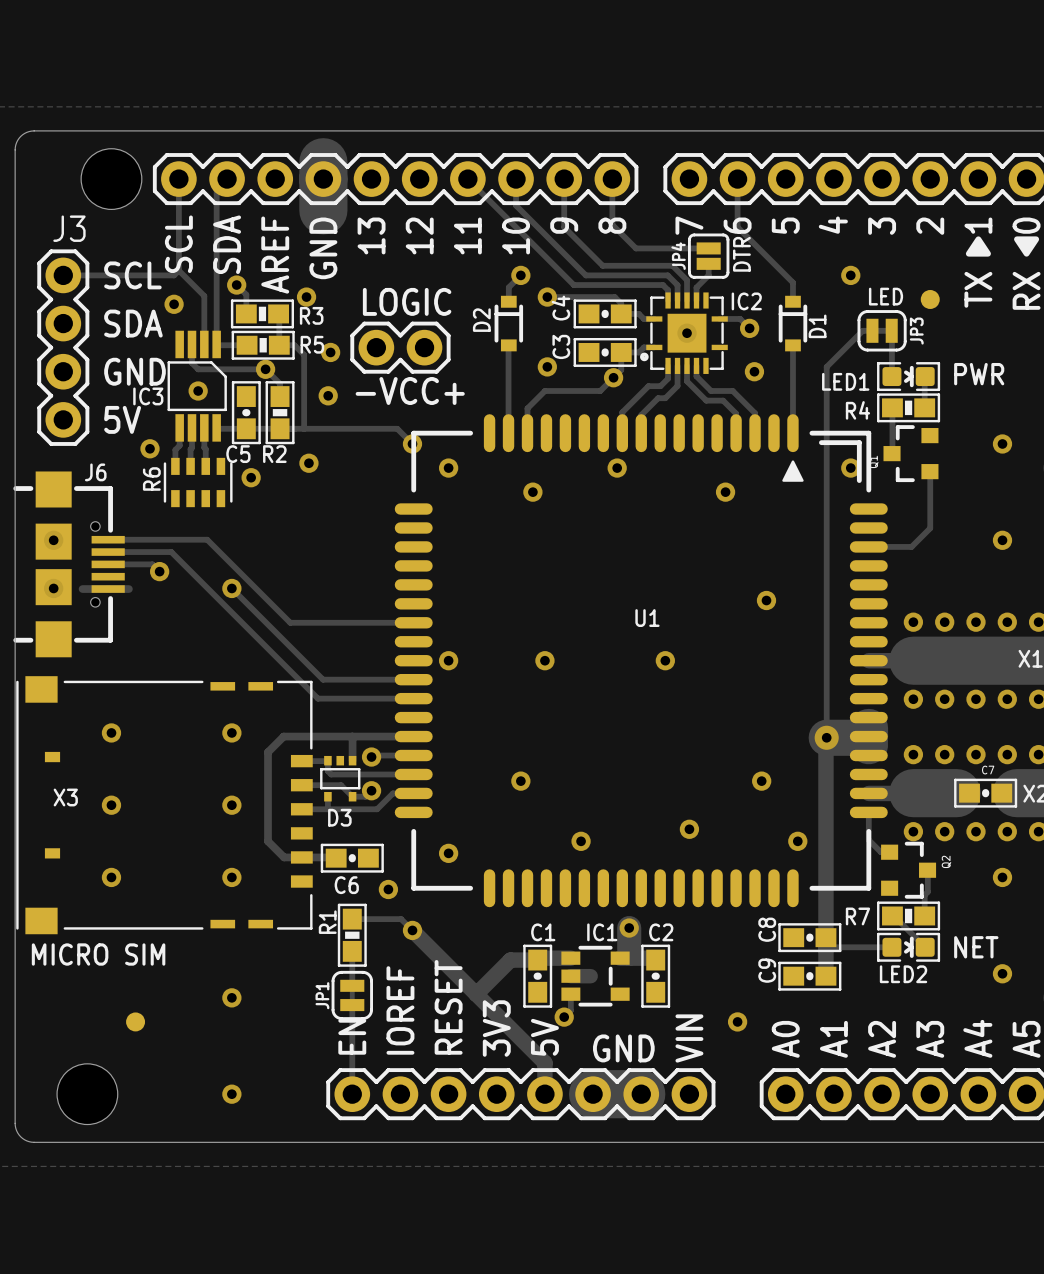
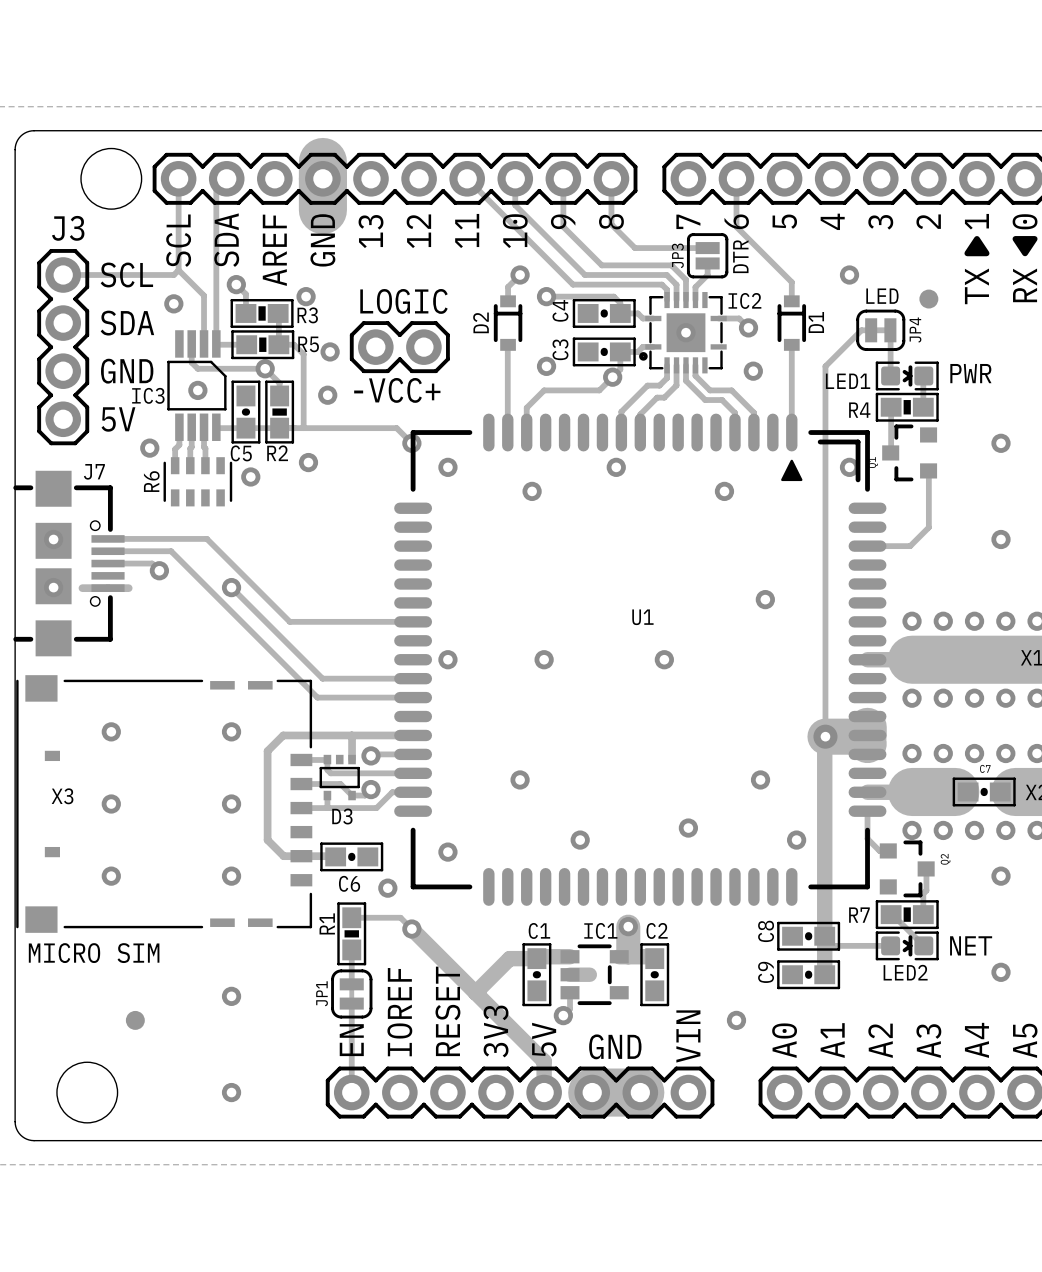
JP4 name: JP4 (678, 256) -> JP3 (677, 255)
JP3 name: JP3 (916, 331) -> JP4 (915, 330)
J6 name: J6 (95, 472) -> J7 (94, 471)

